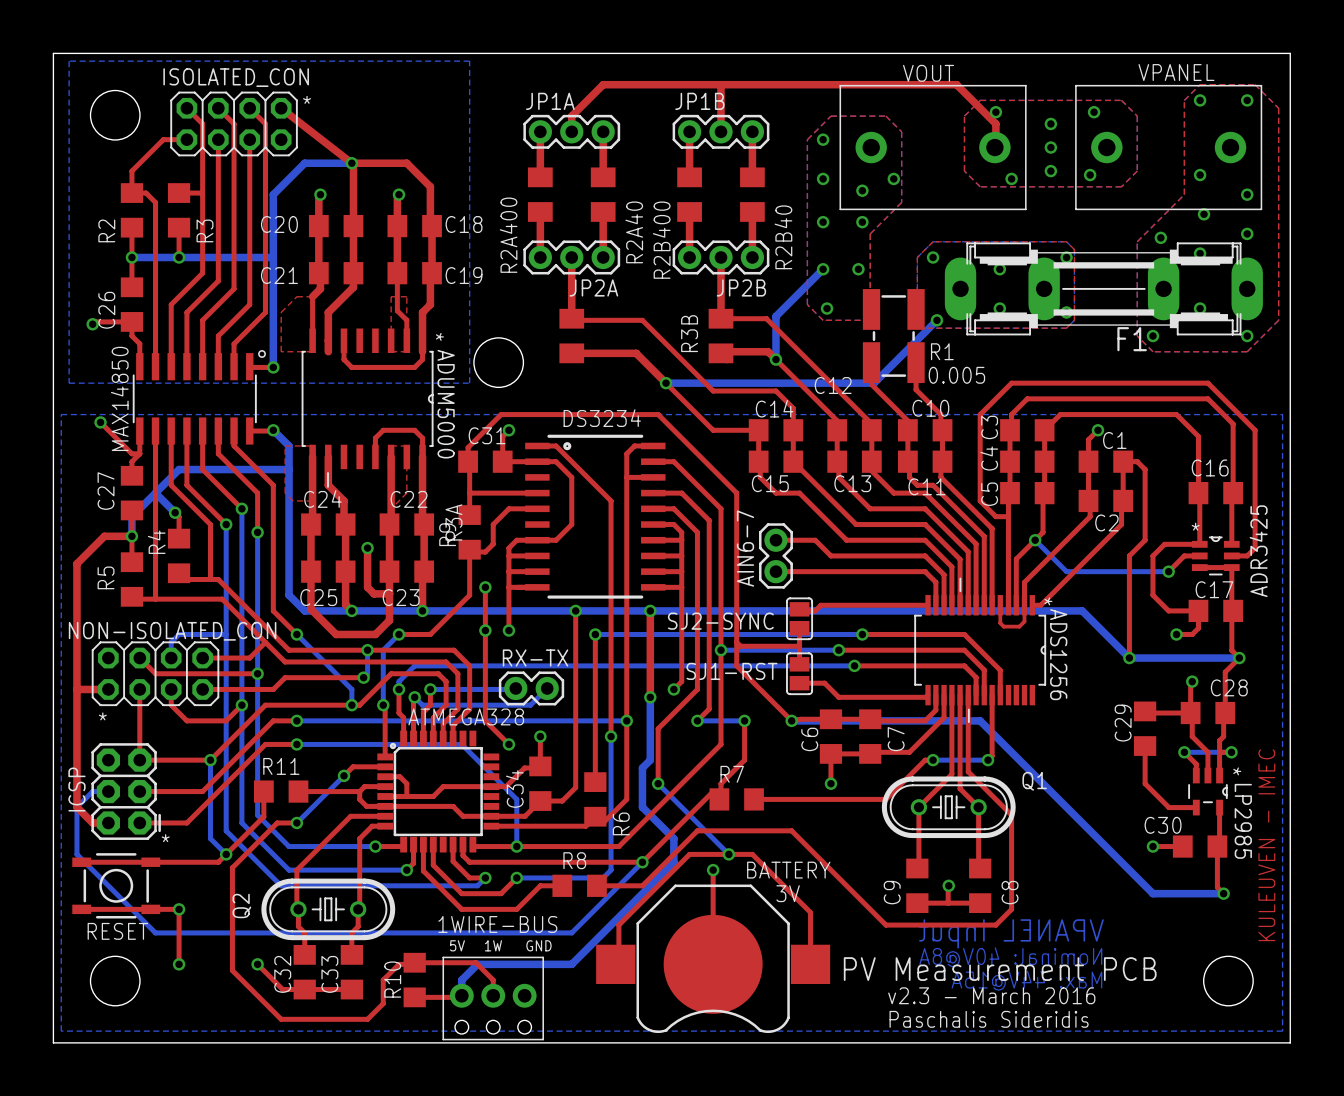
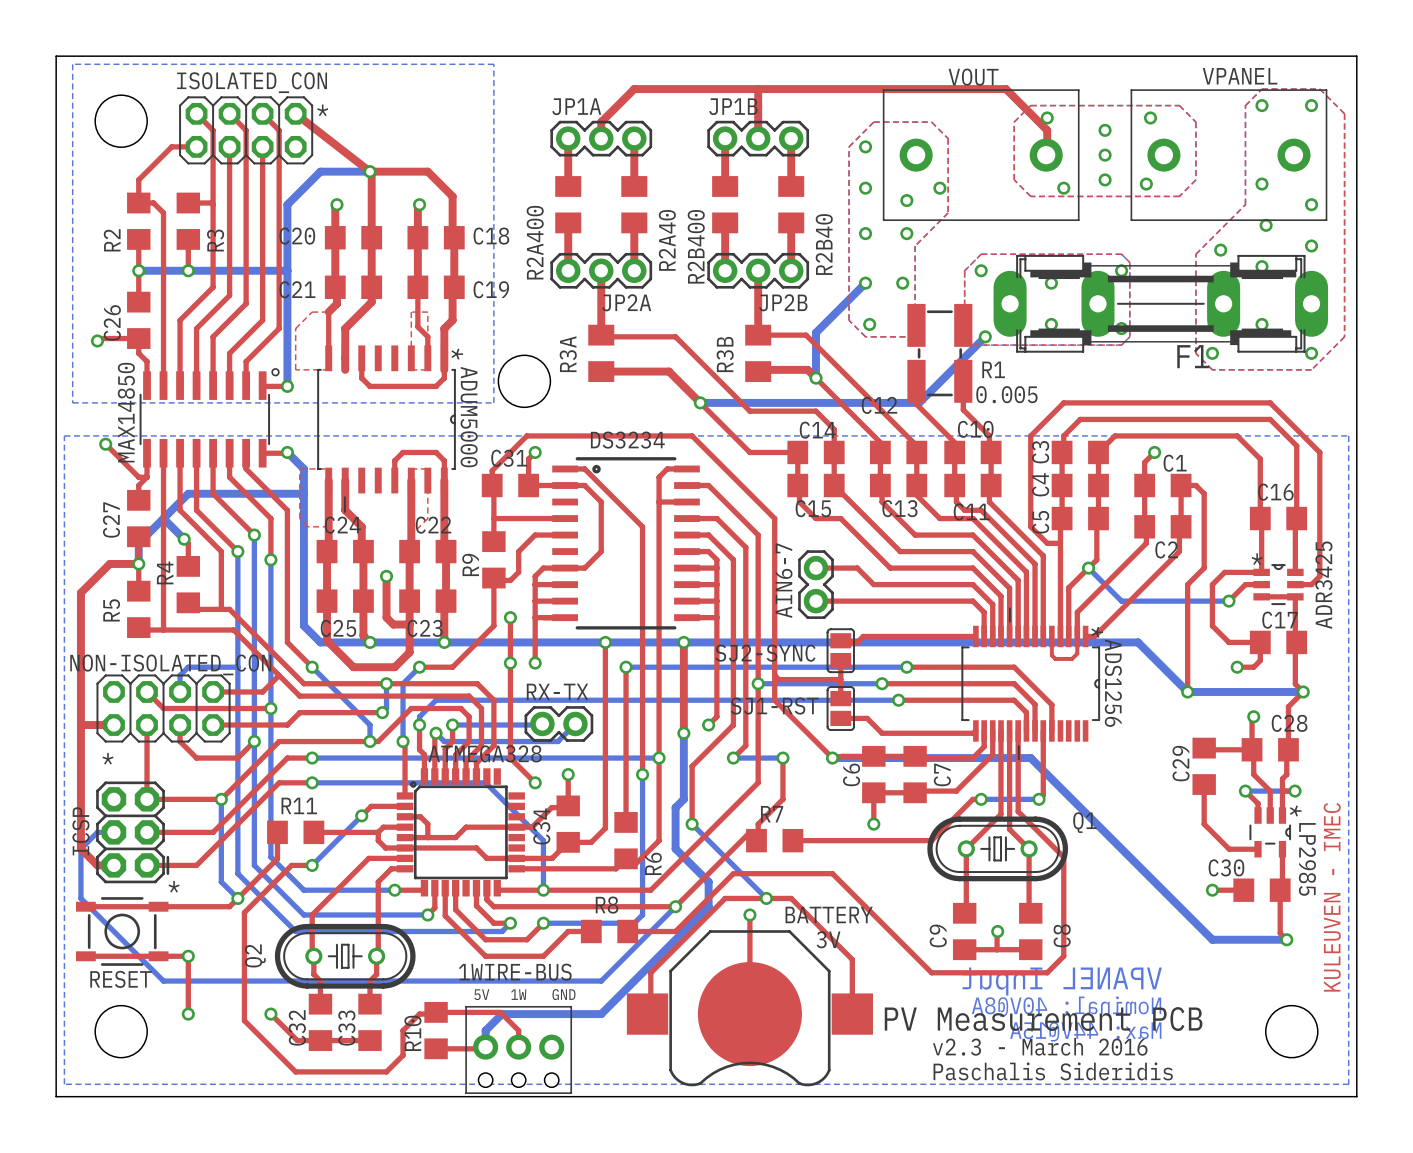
R3A name position: R3A (453, 522) -> R3A (568, 354)

